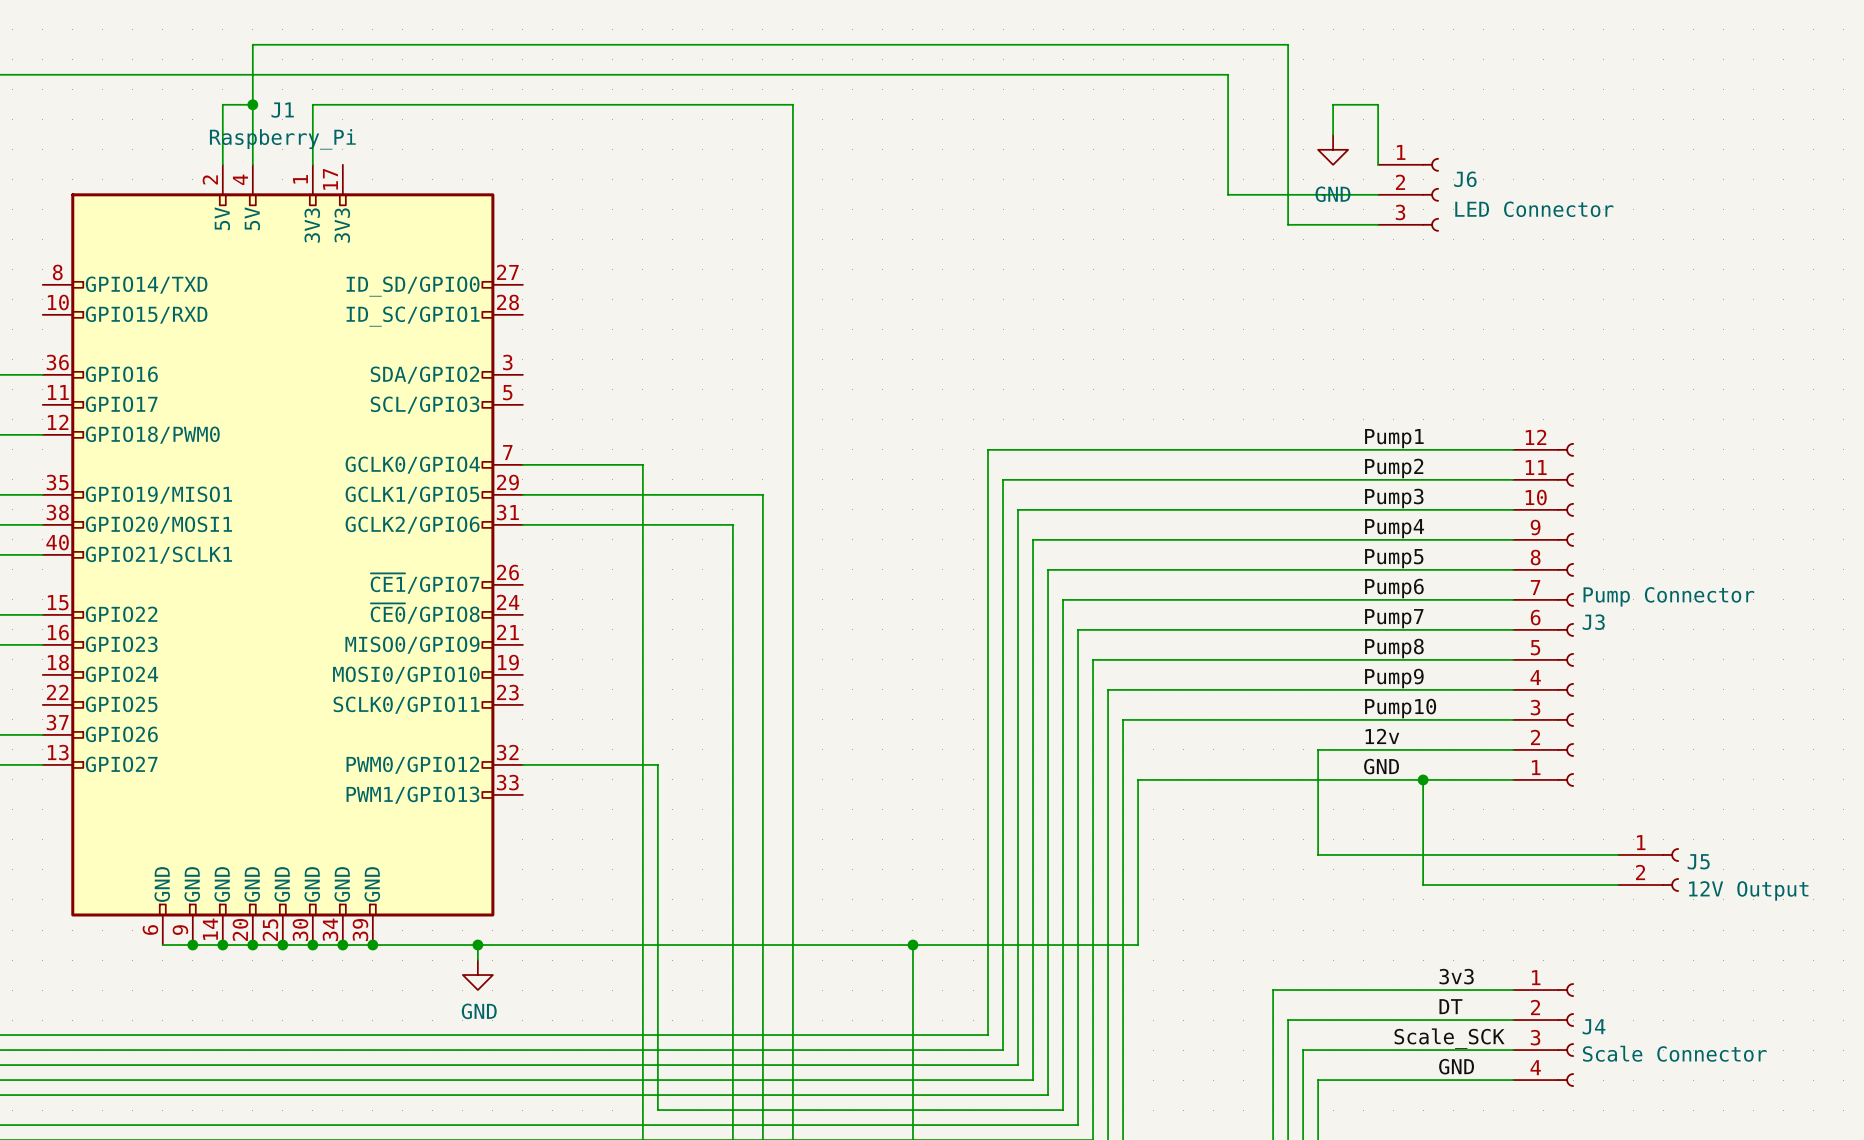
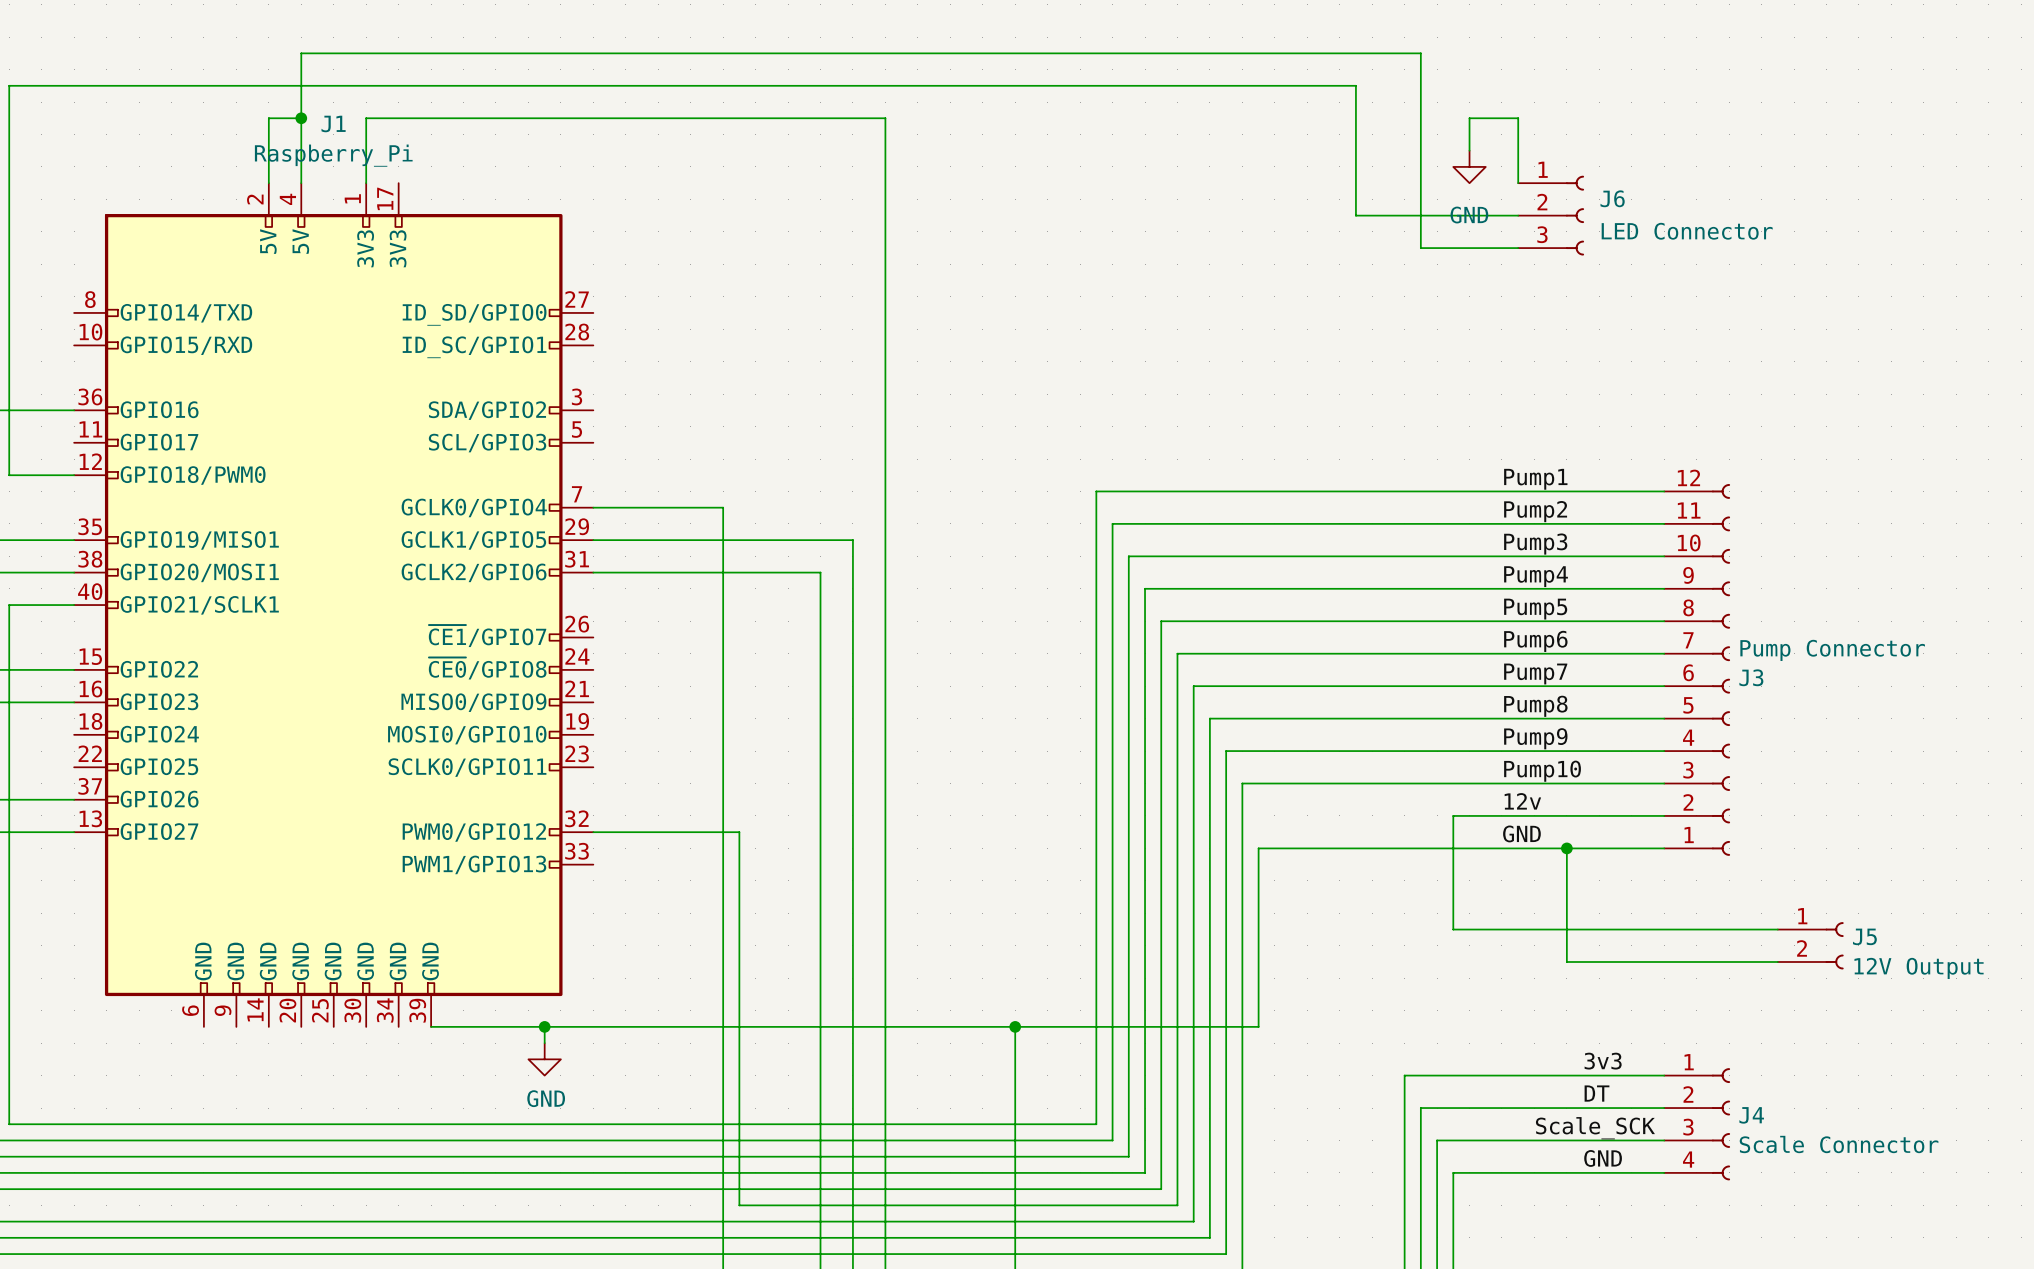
wire: (162, 945) (372, 945) -> none
junction: (192, 945) -> none
junction: (222, 945) -> none
junction: (252, 945) -> none
junction: (282, 945) -> none
junction: (312, 945) -> none
junction: (342, 945) -> none
junction: (372, 945) -> none

